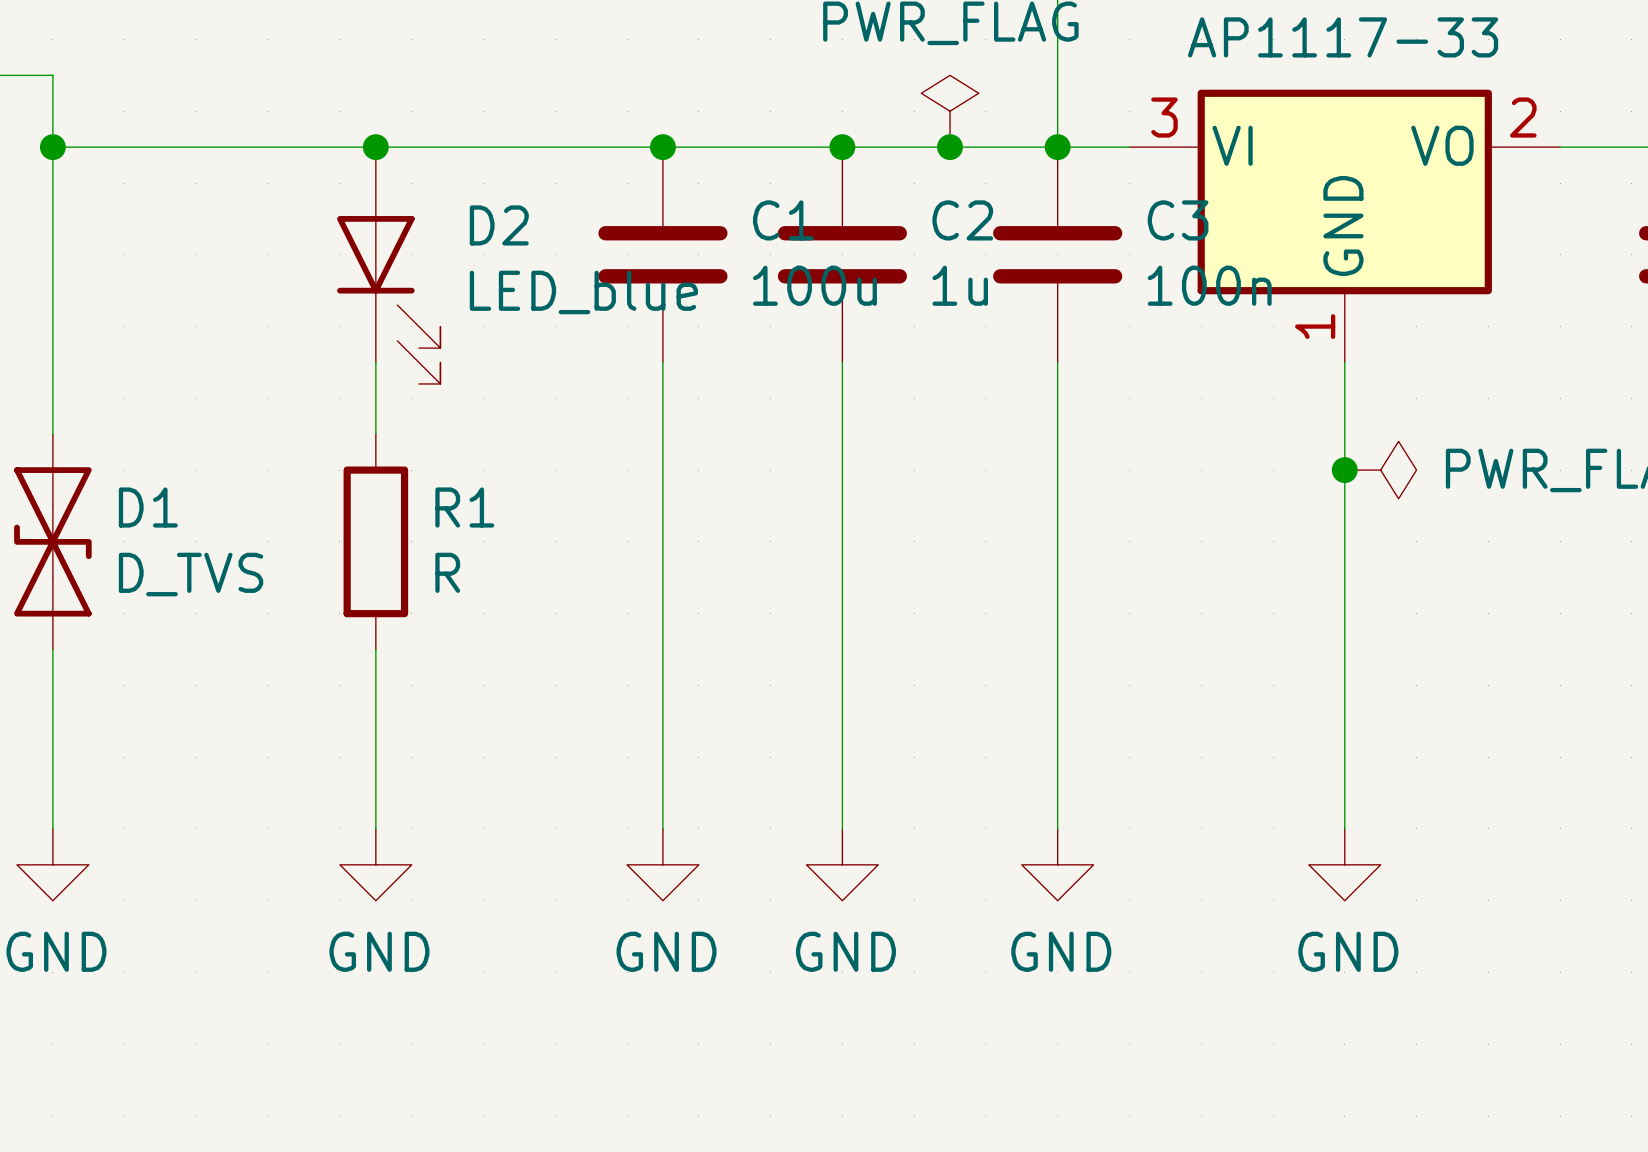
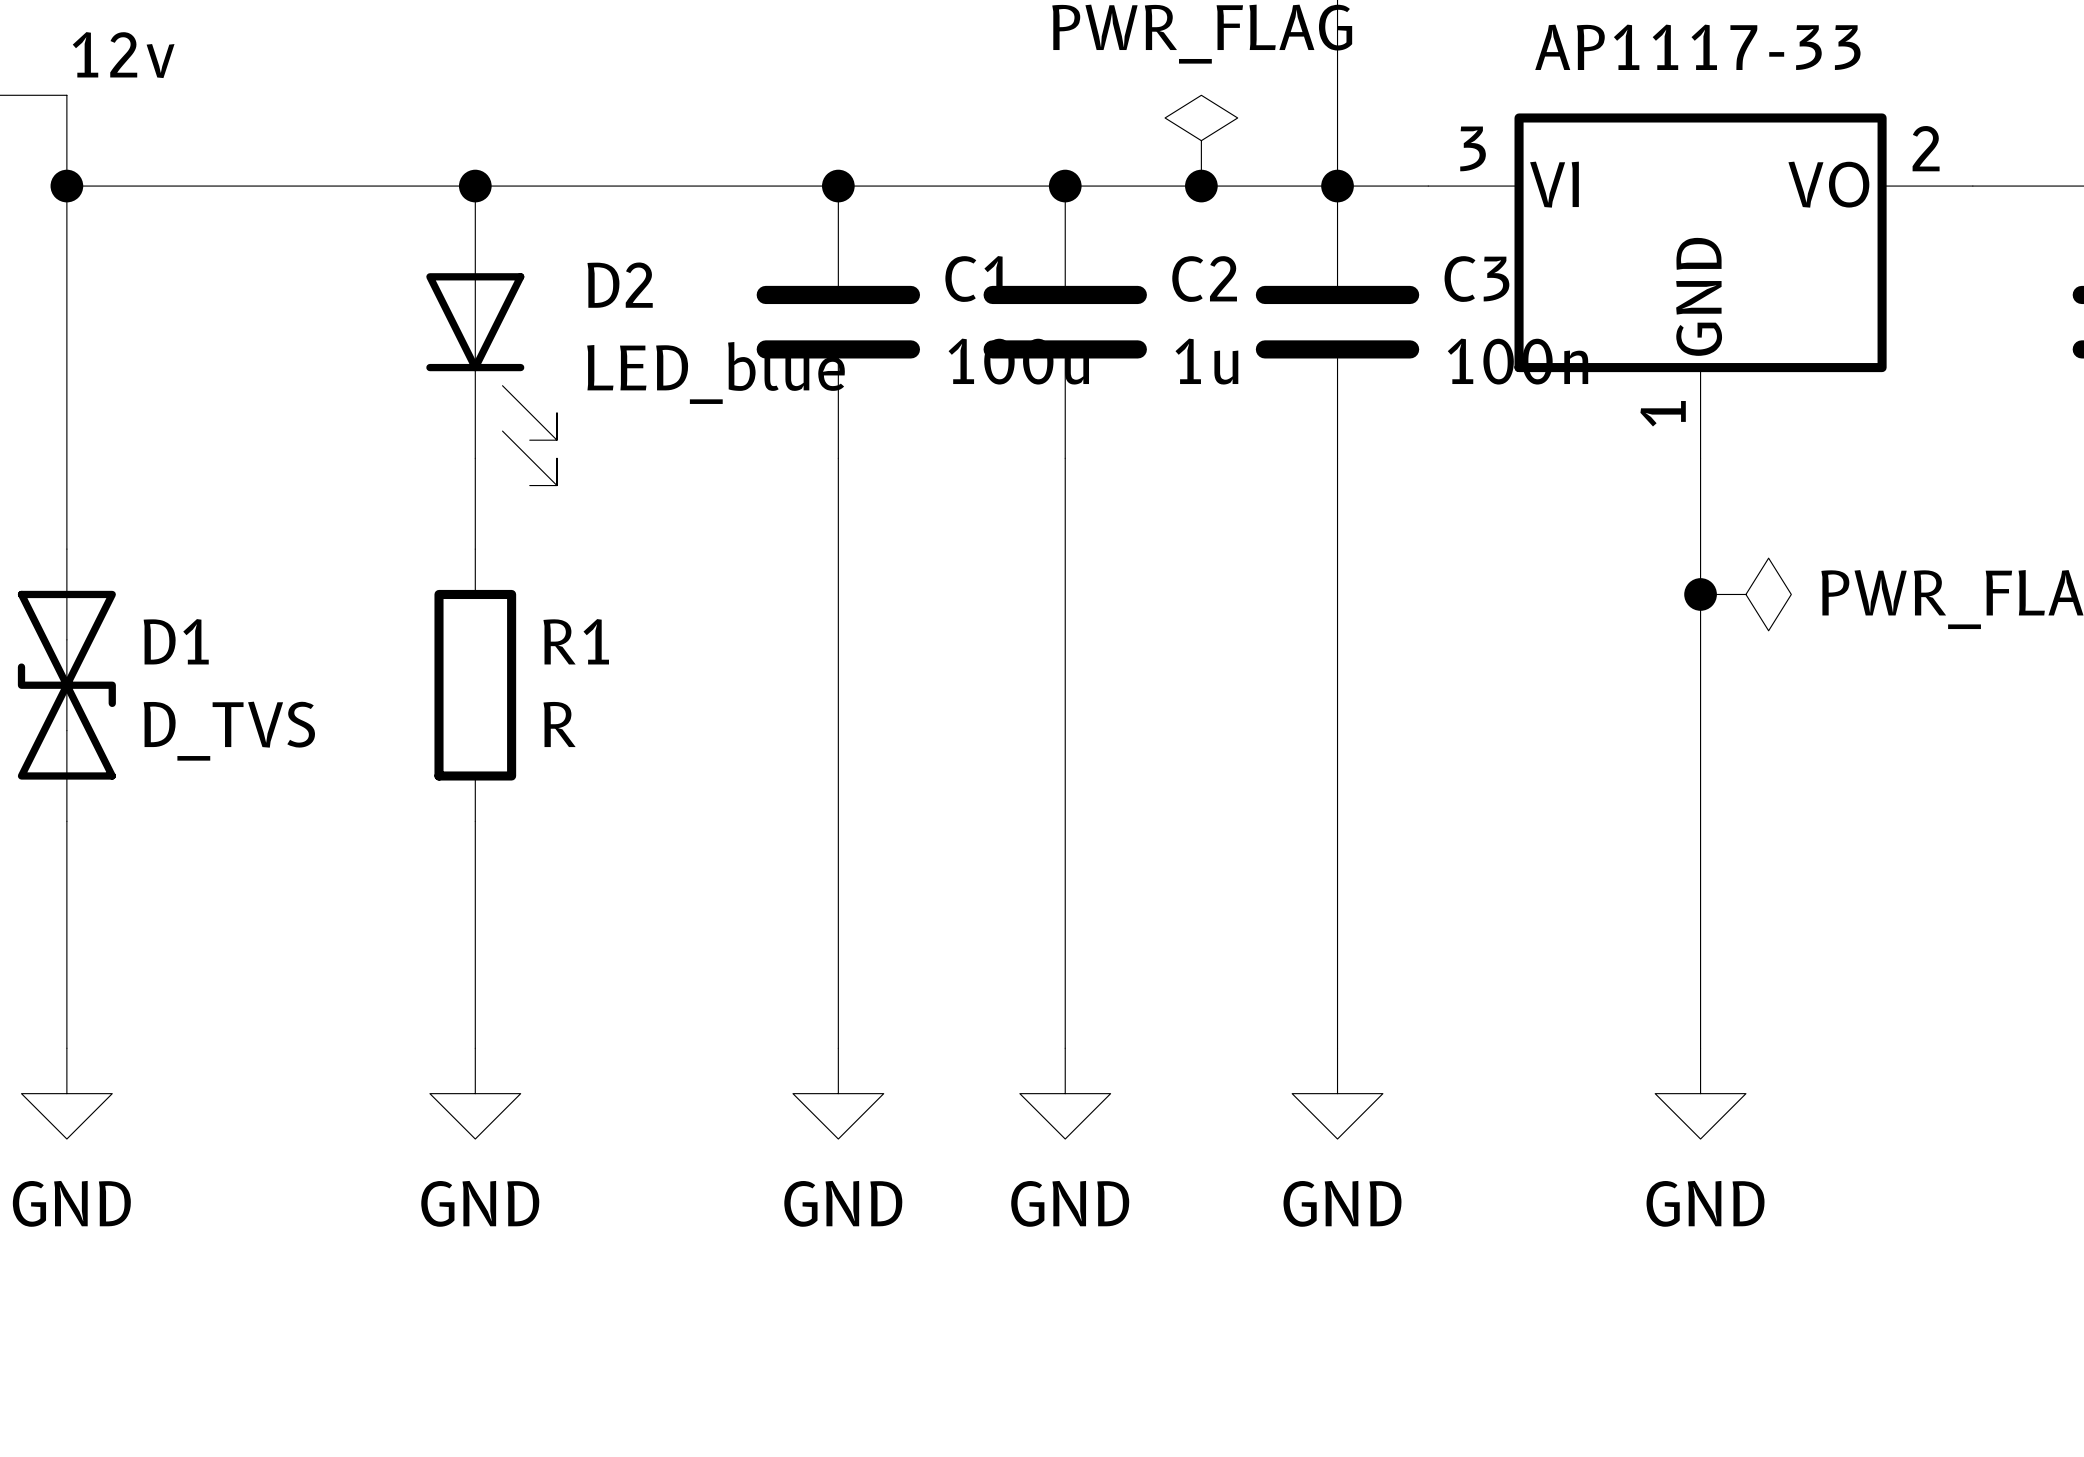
label: none -> 12v (123, 55)

